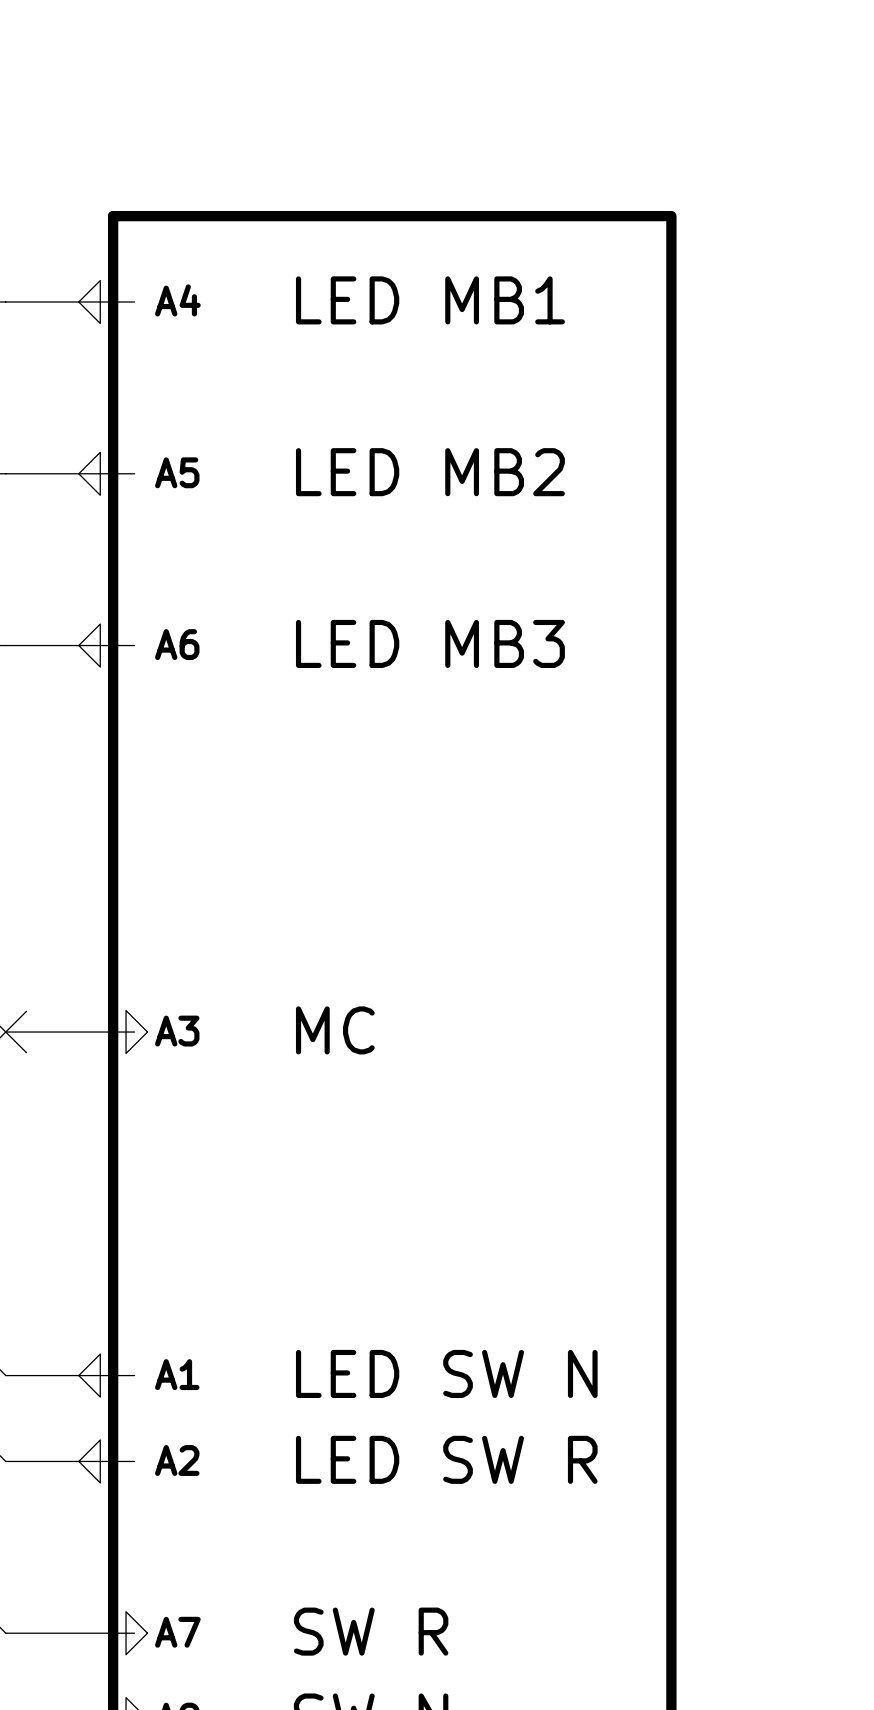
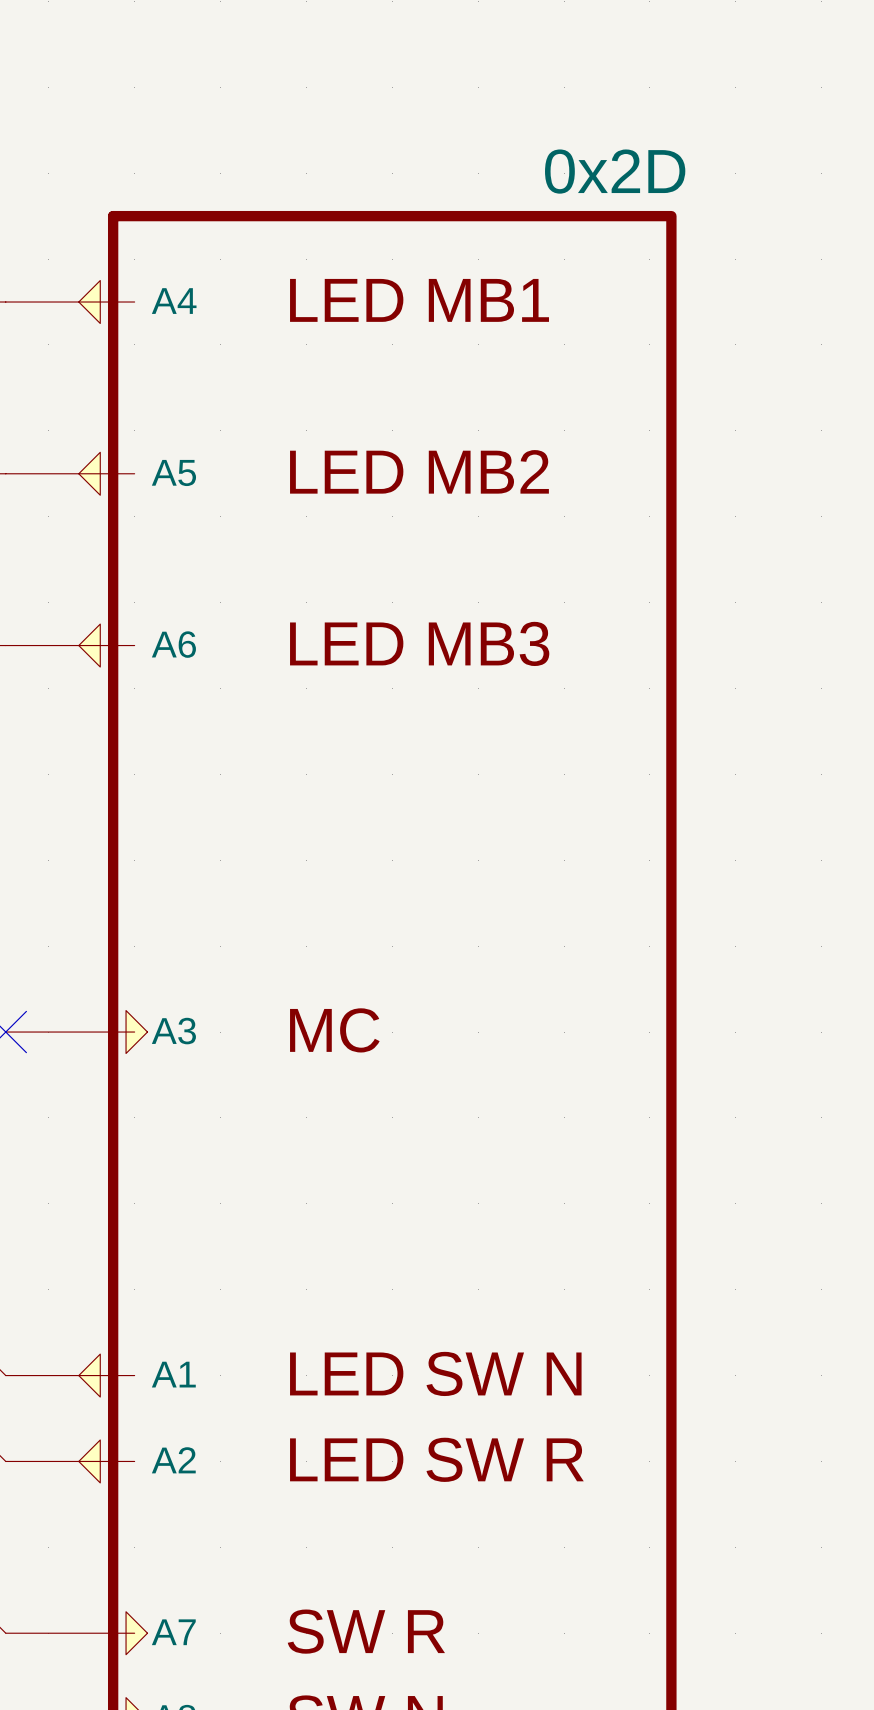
part value: none -> 0x2D (615, 171)

